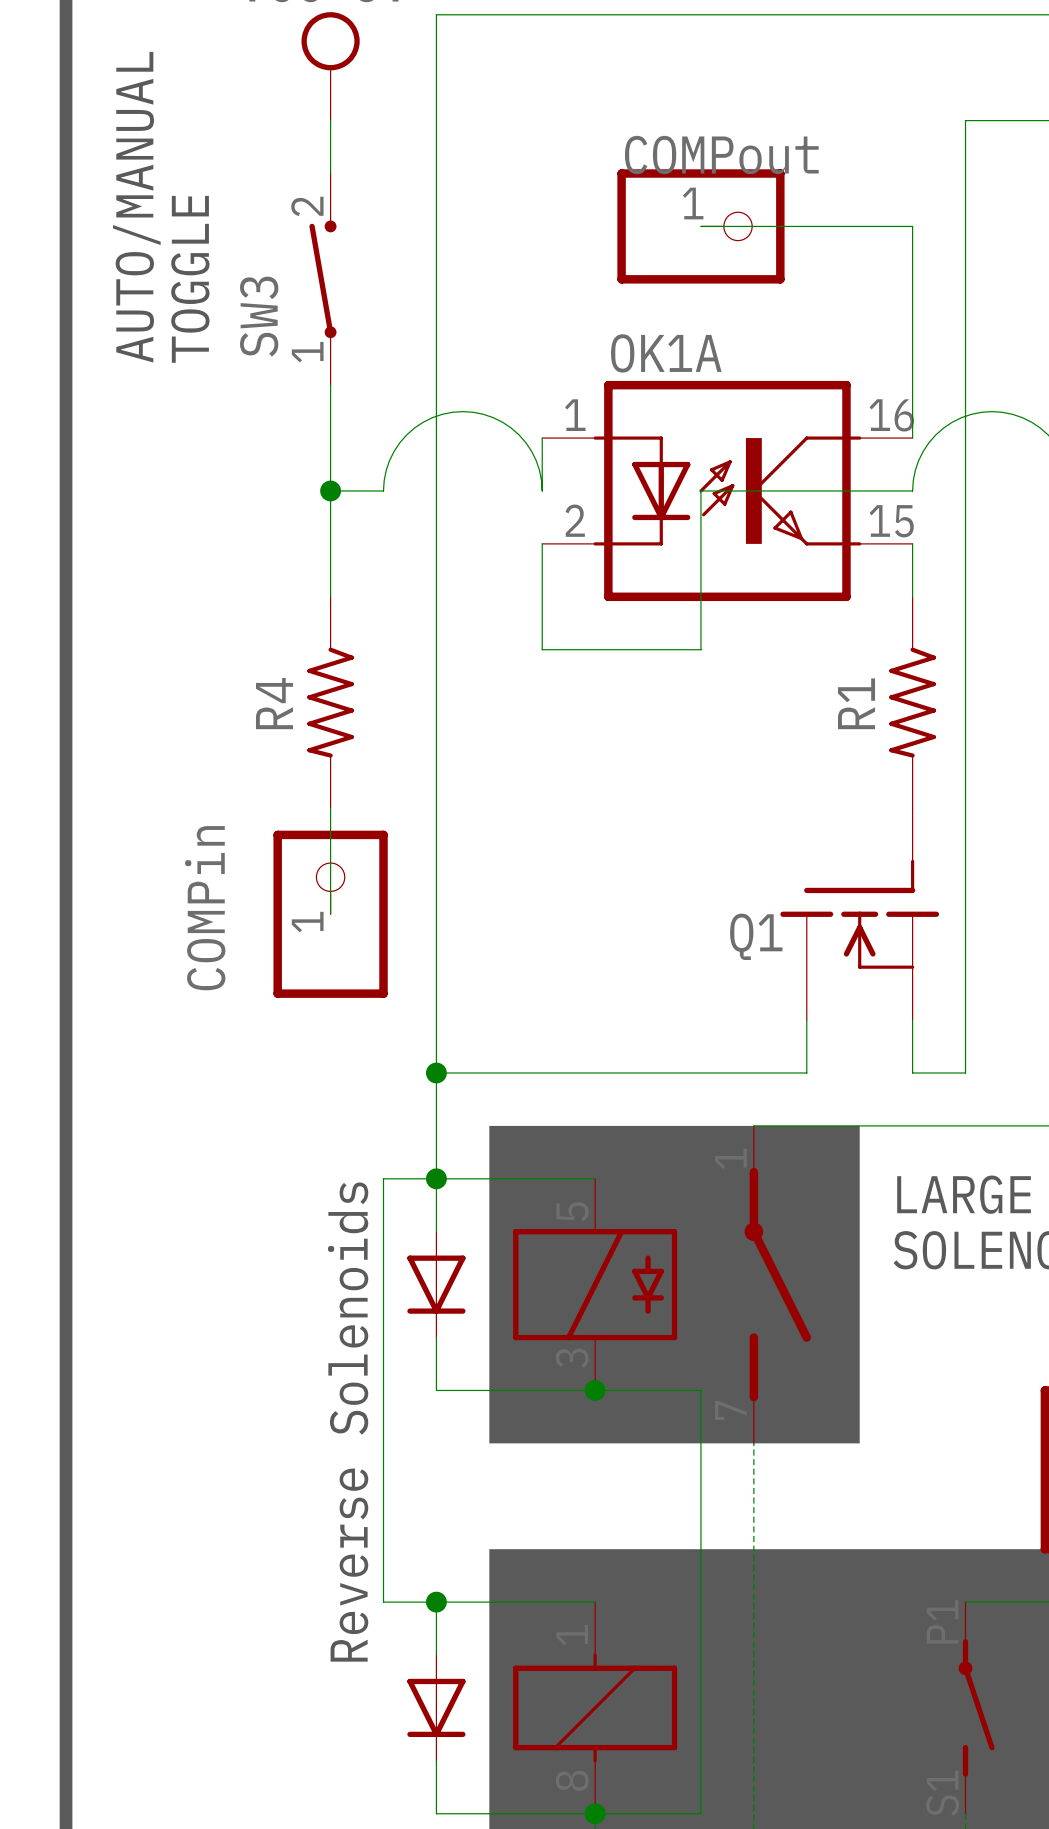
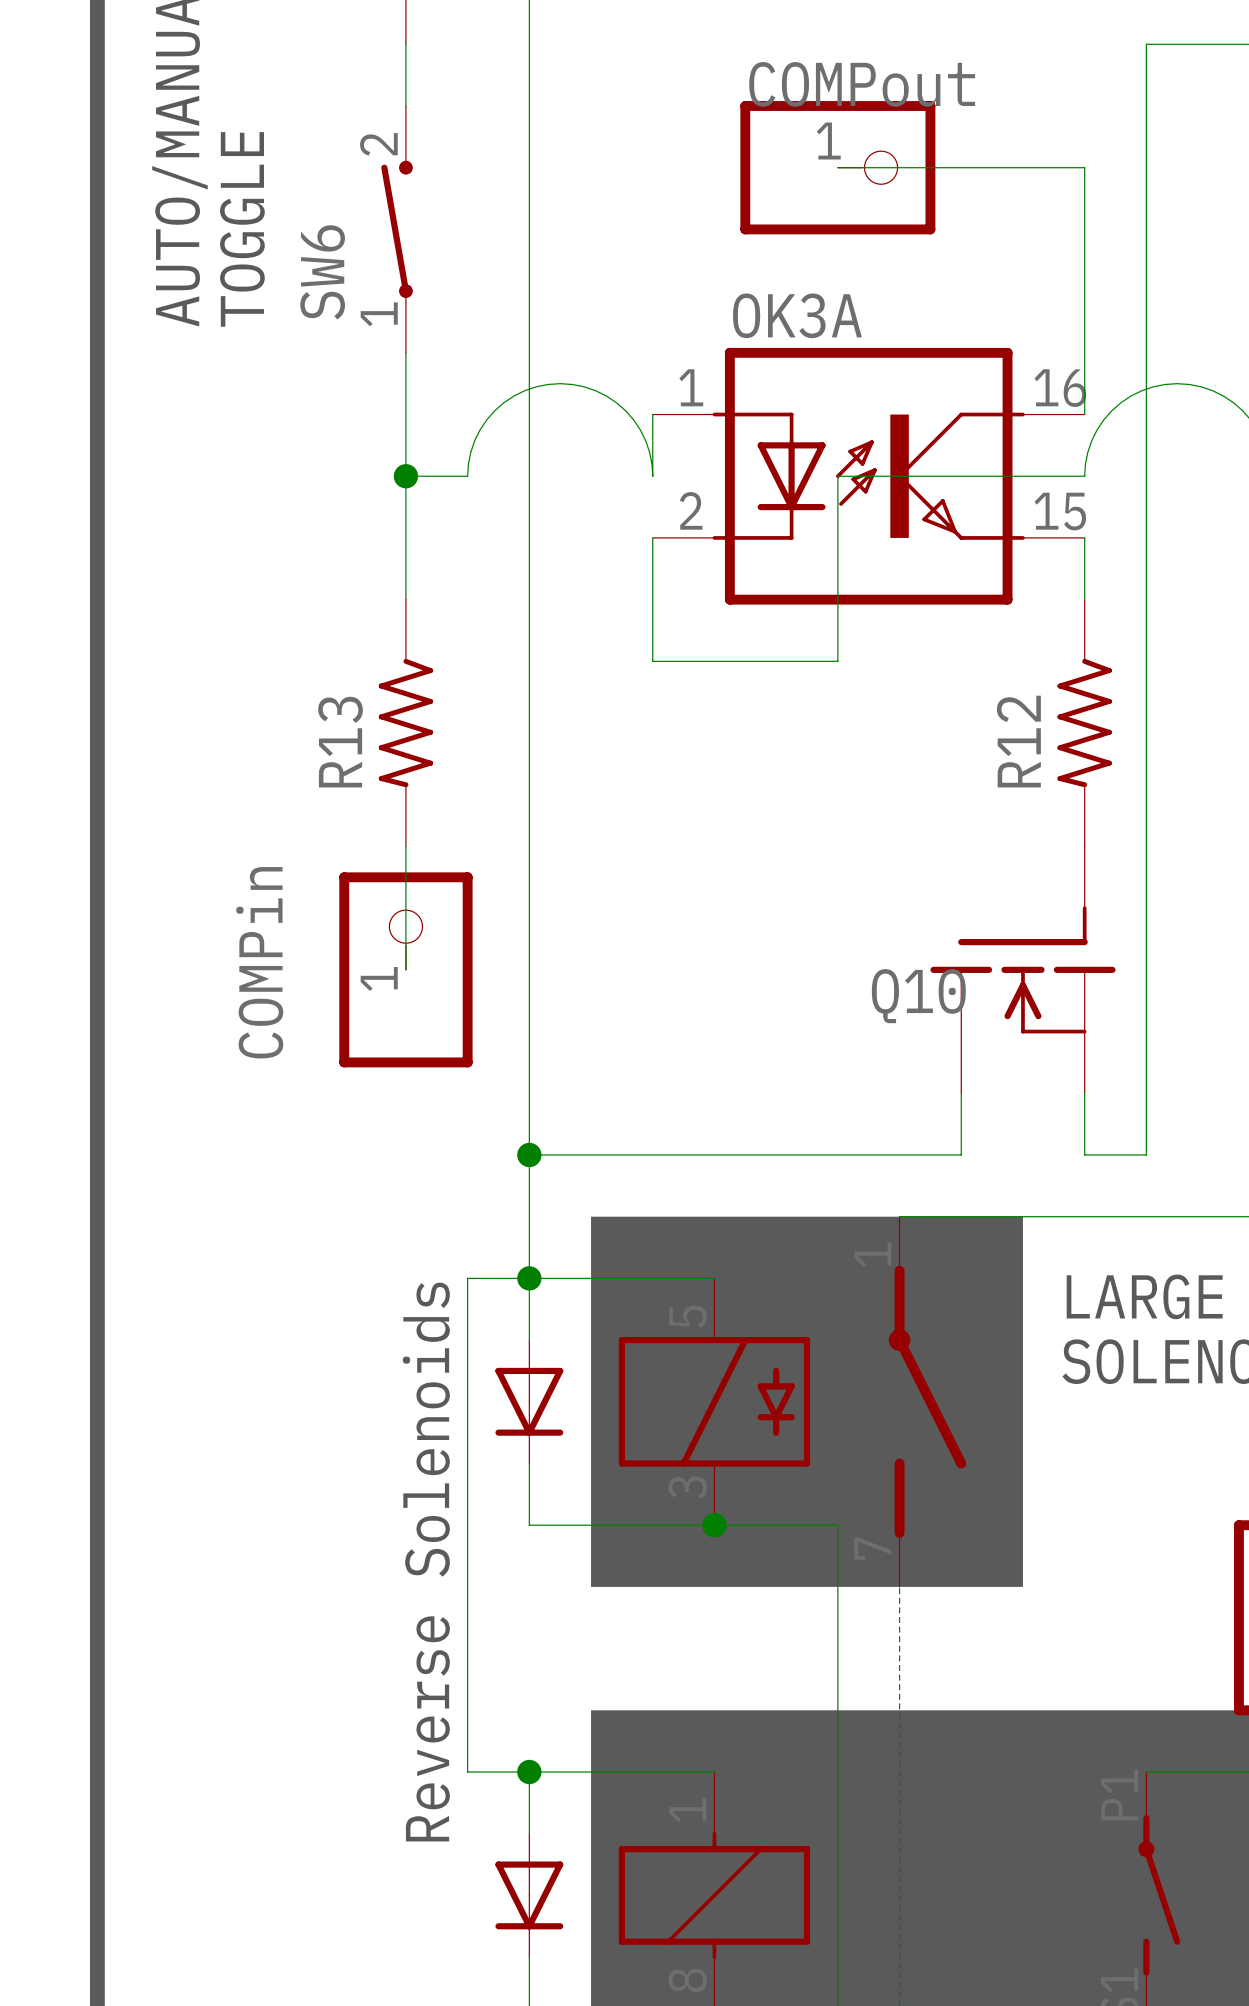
SW3 name: SW3 (259, 316) -> SW6 (322, 272)
OK1A name: OK1A (666, 353) -> OK3A (797, 315)
R4 name: R4 (274, 703) -> R13 (340, 742)
R1 name: R1 (856, 703) -> R12 (1018, 741)
Q1 name: Q1 (756, 936) -> Q10 (918, 996)

